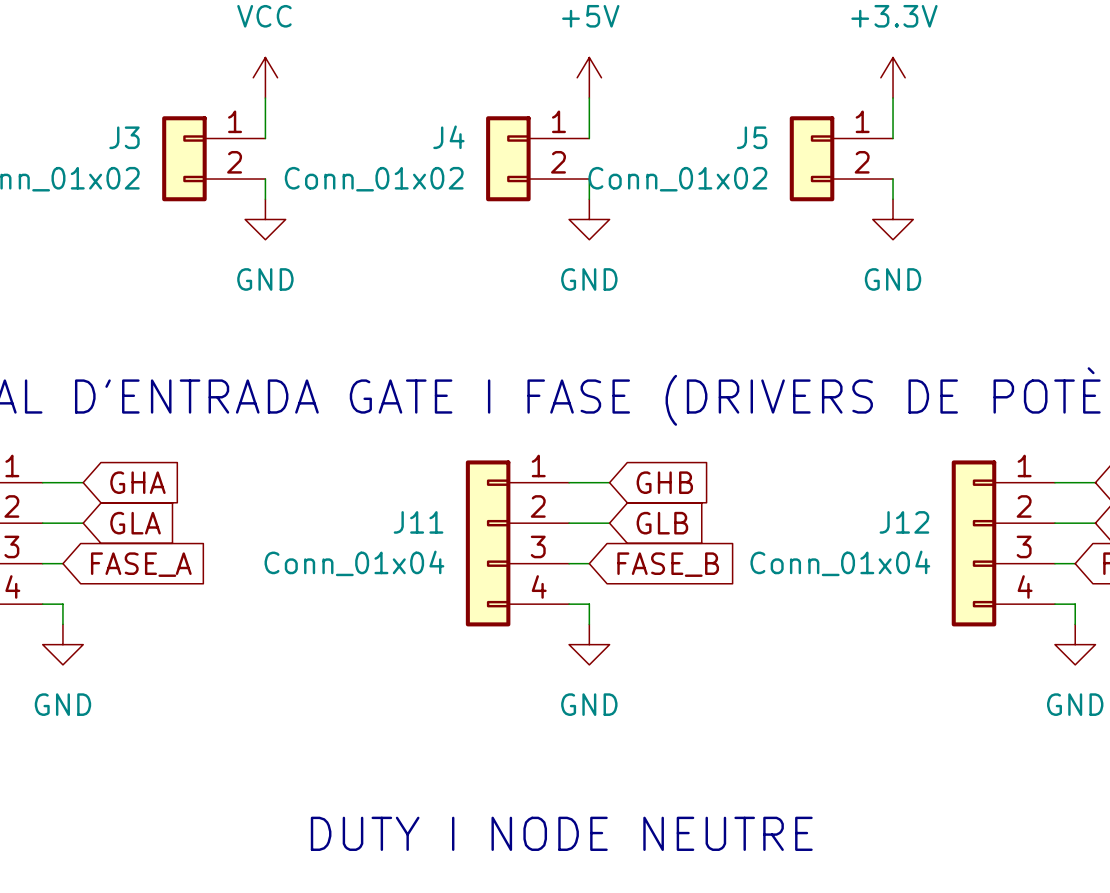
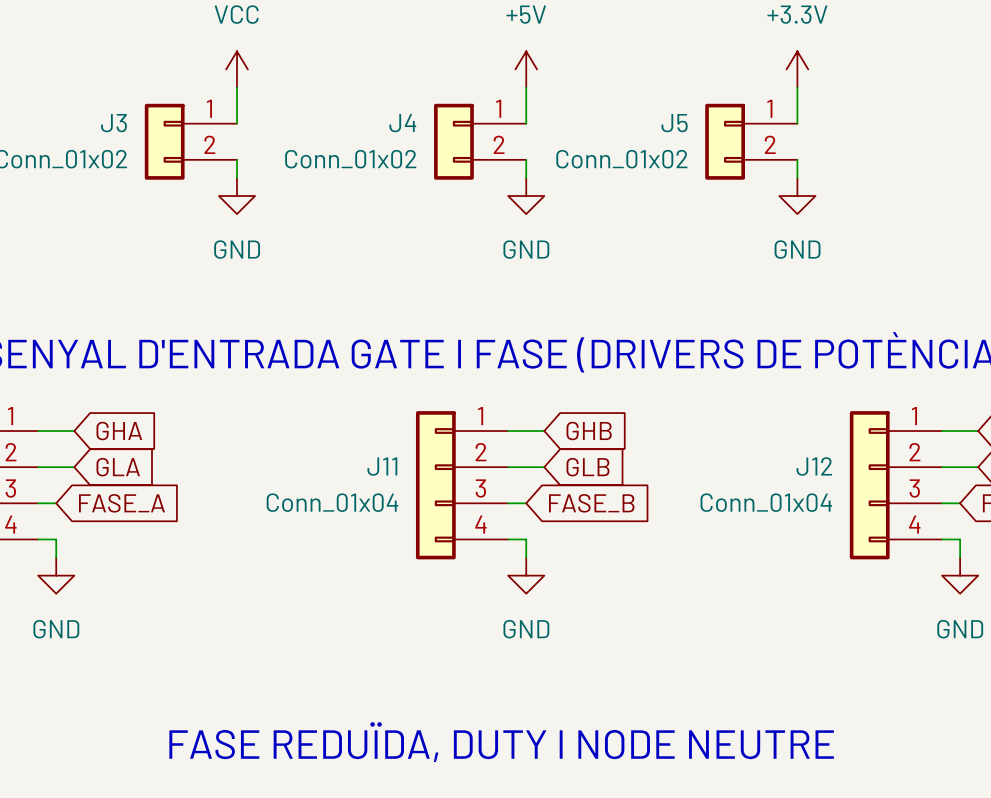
text: DUTY I NODE NEUTRE (561, 833) -> FASE REDUÏDA, DUTY I NODE NEUTRE (501, 742)

